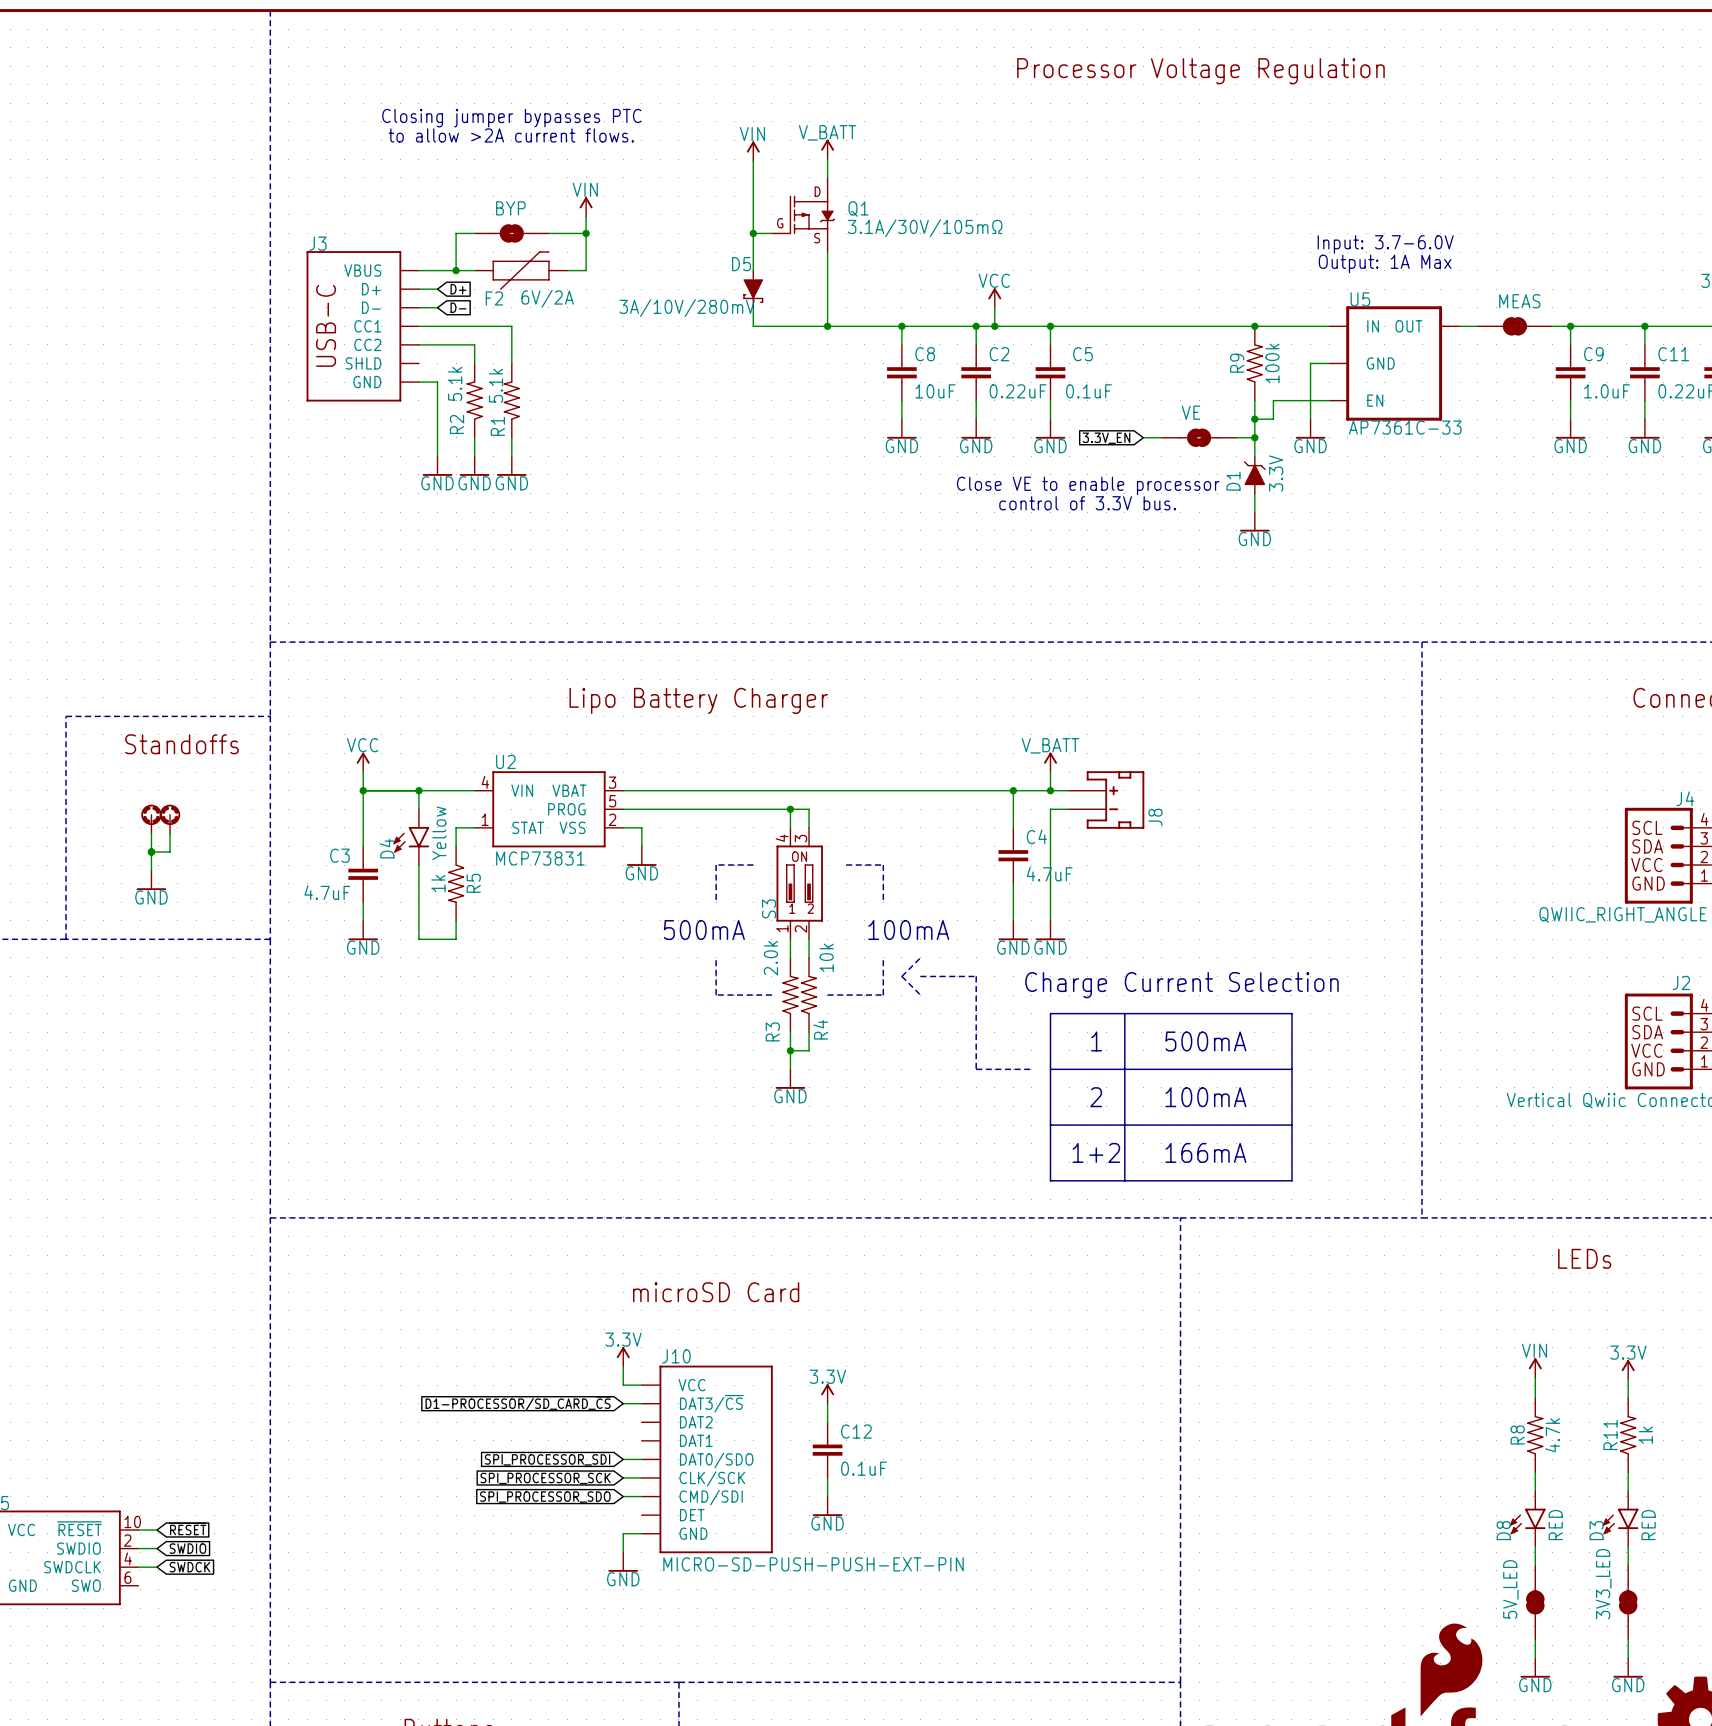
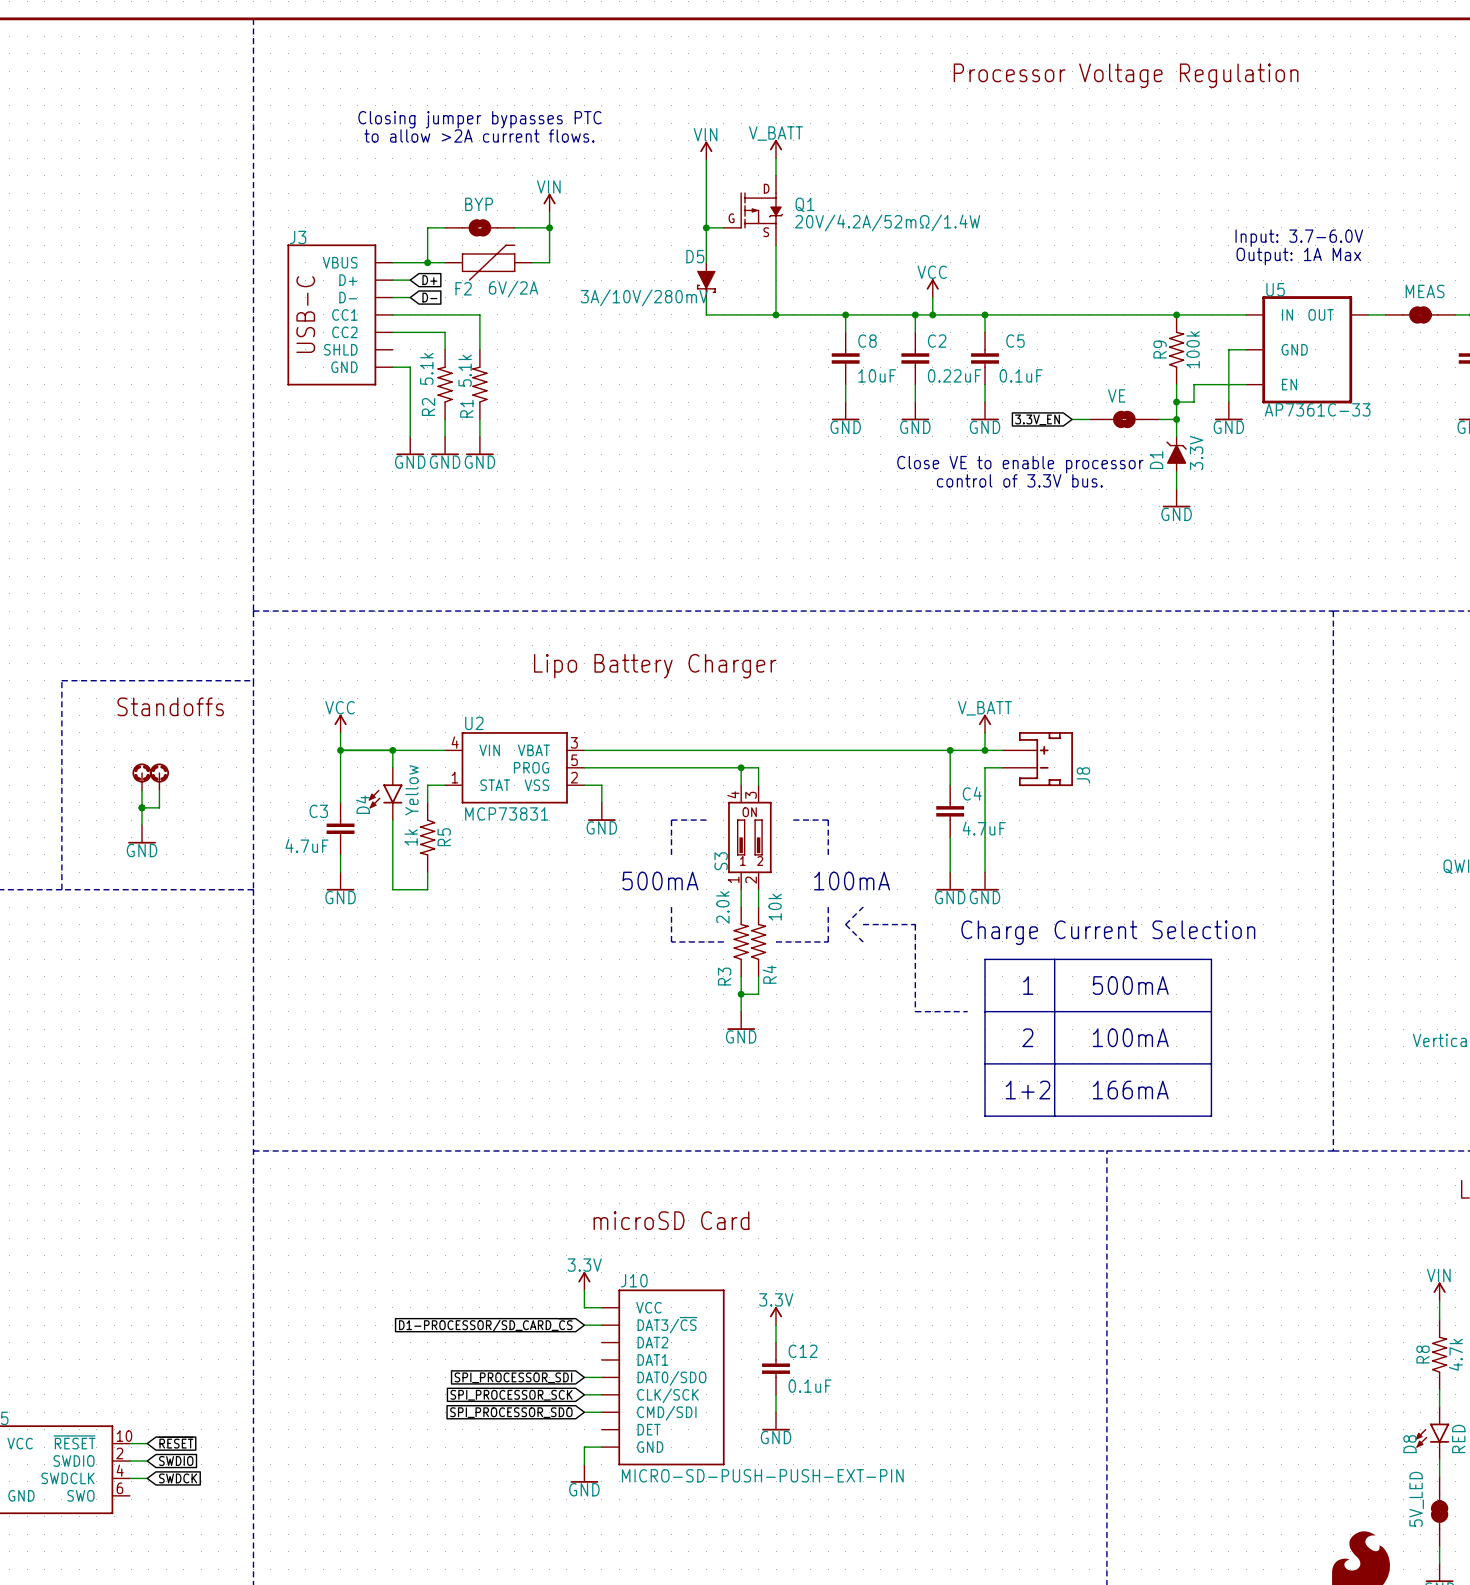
Q1 value: 3.1A/30V/105mΩ (925, 228) -> 20V/4.2A/52mΩ/1.4W (887, 222)

